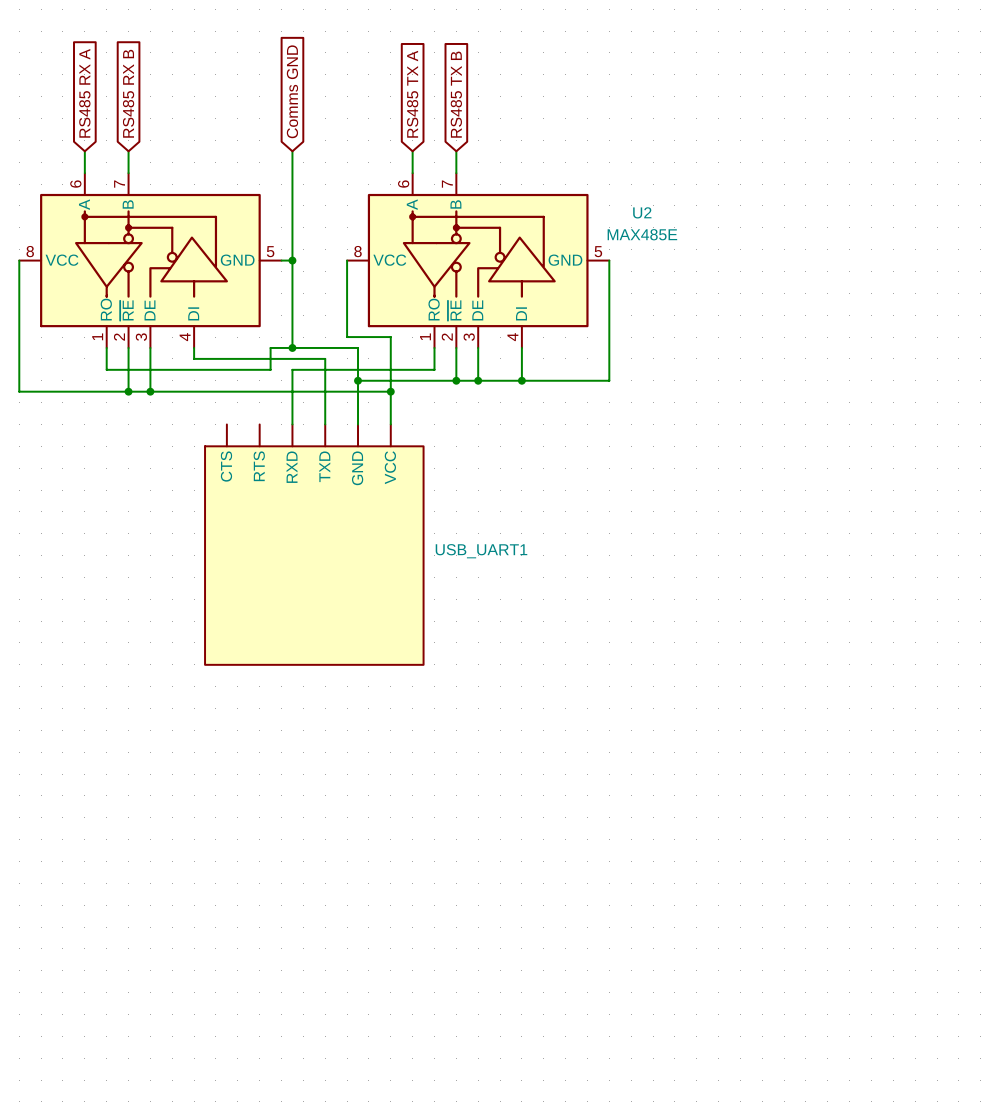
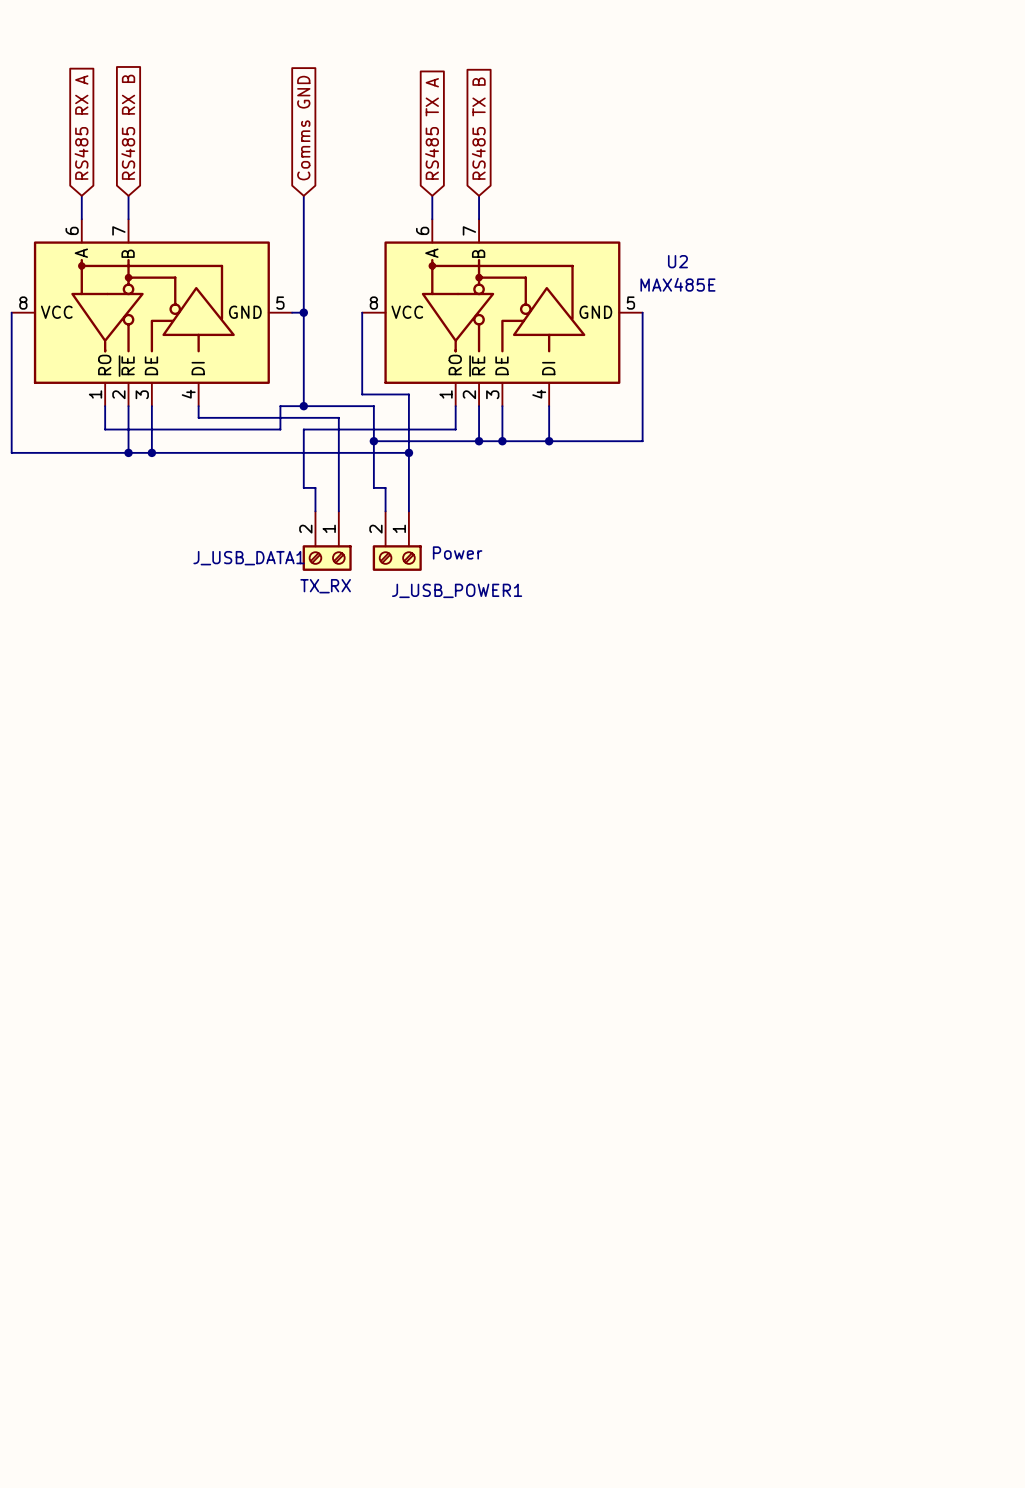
wire: none -> (303, 487) (315, 487) (315, 511)
wire: none -> (373, 487) (385, 487) (385, 511)
J_USB_DATA1: none -> TX_RX (327, 541)
J_USB_POWER1: none -> Power (397, 541)
USB_UART1: (314, 544) -> none

